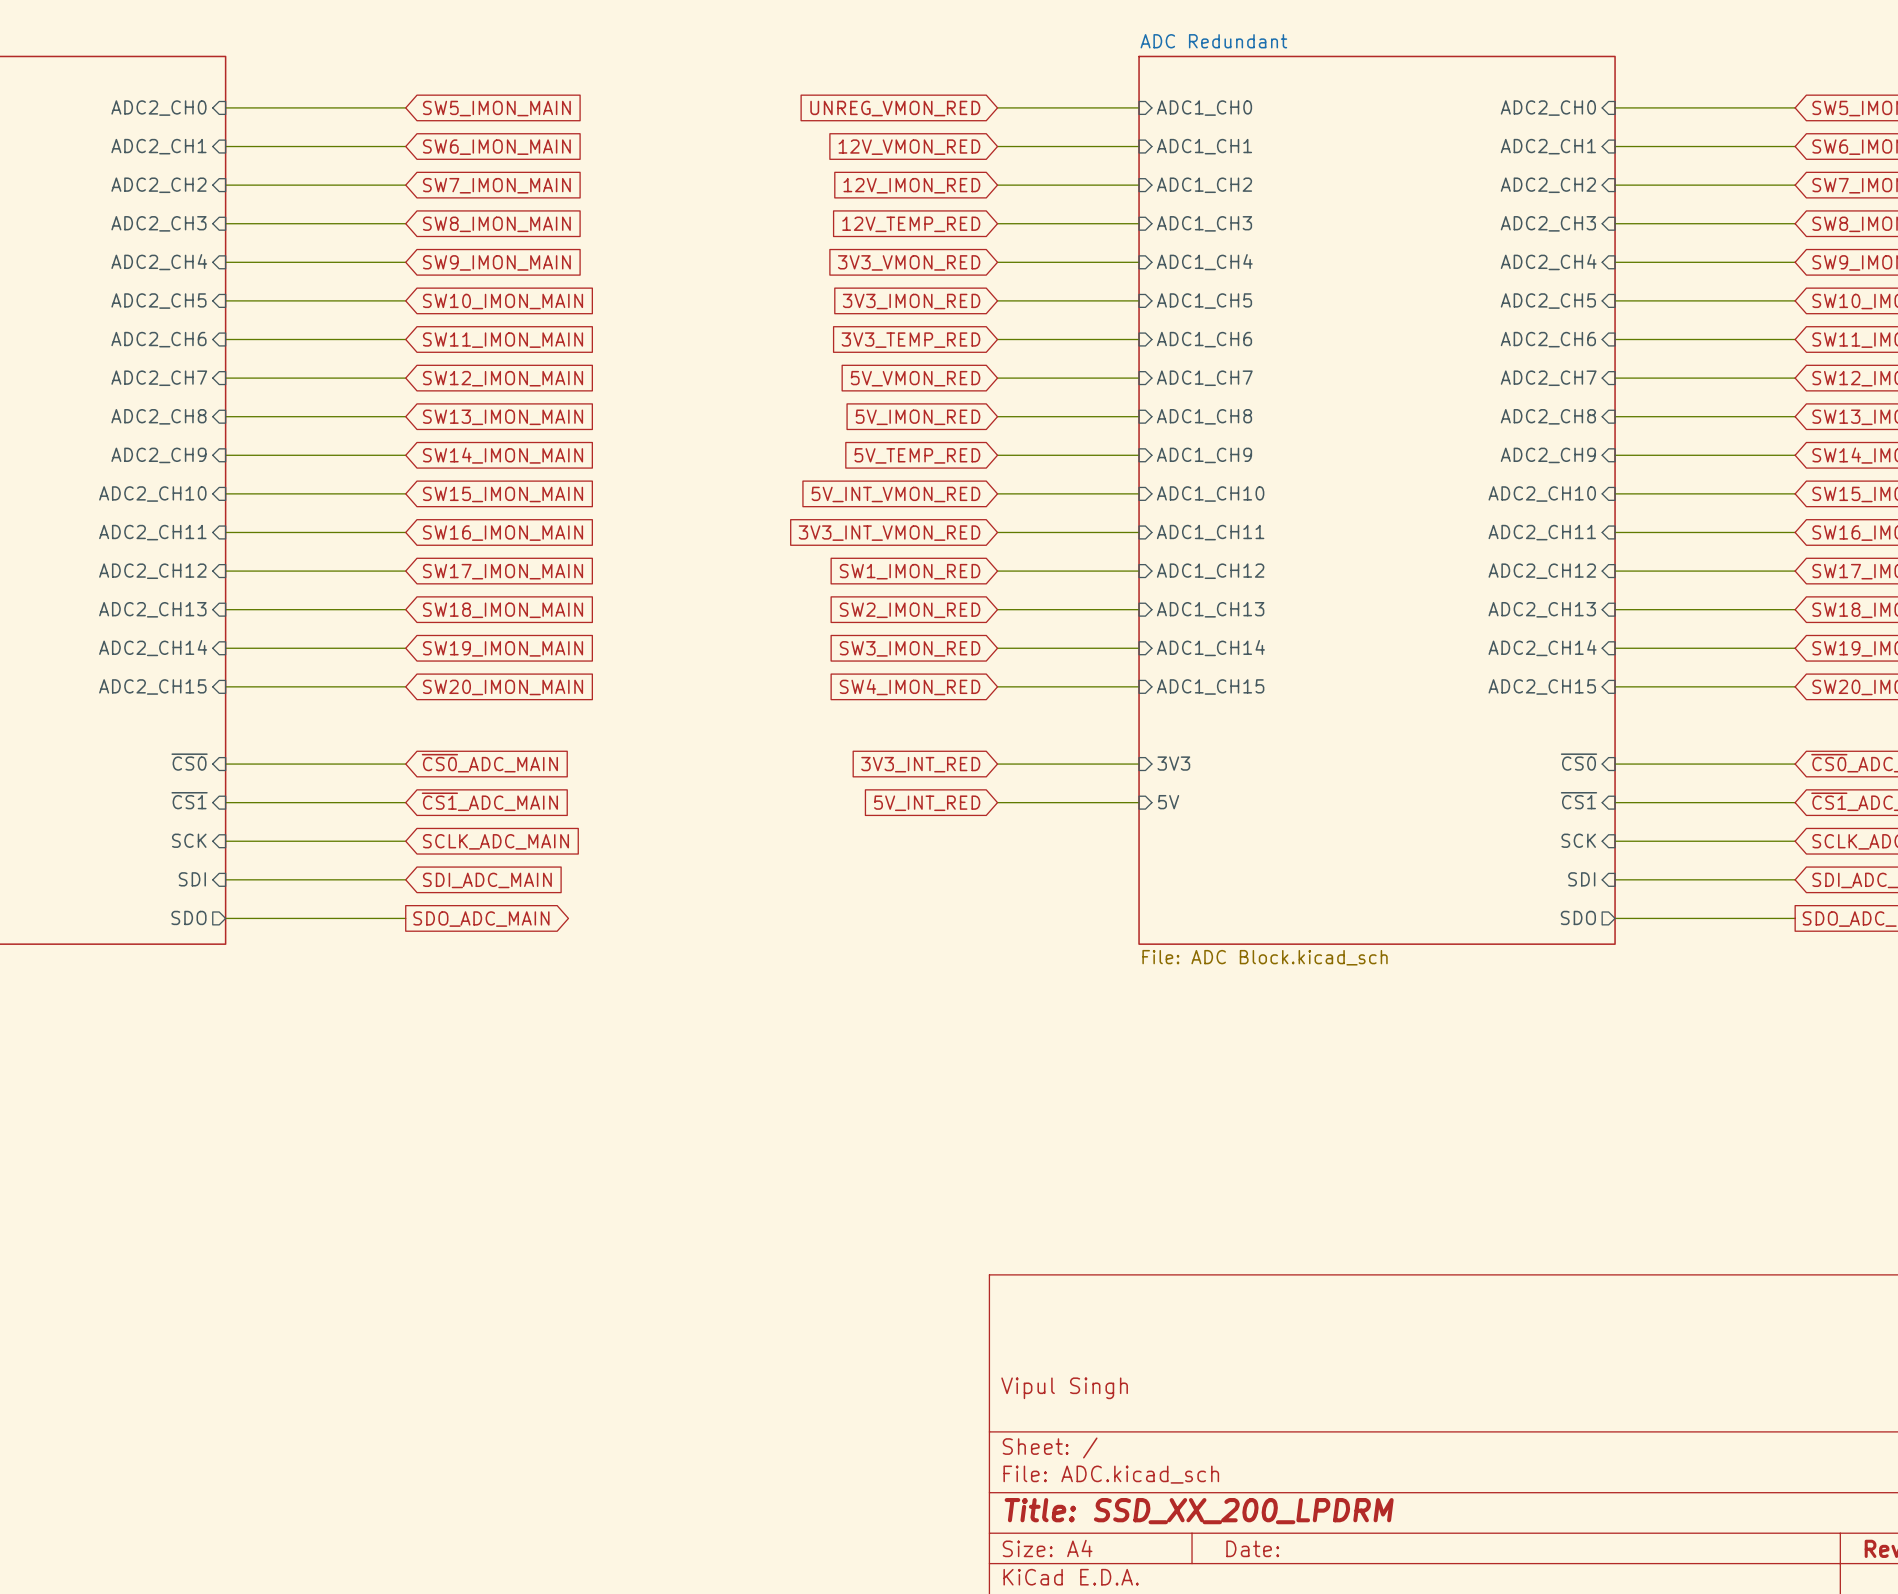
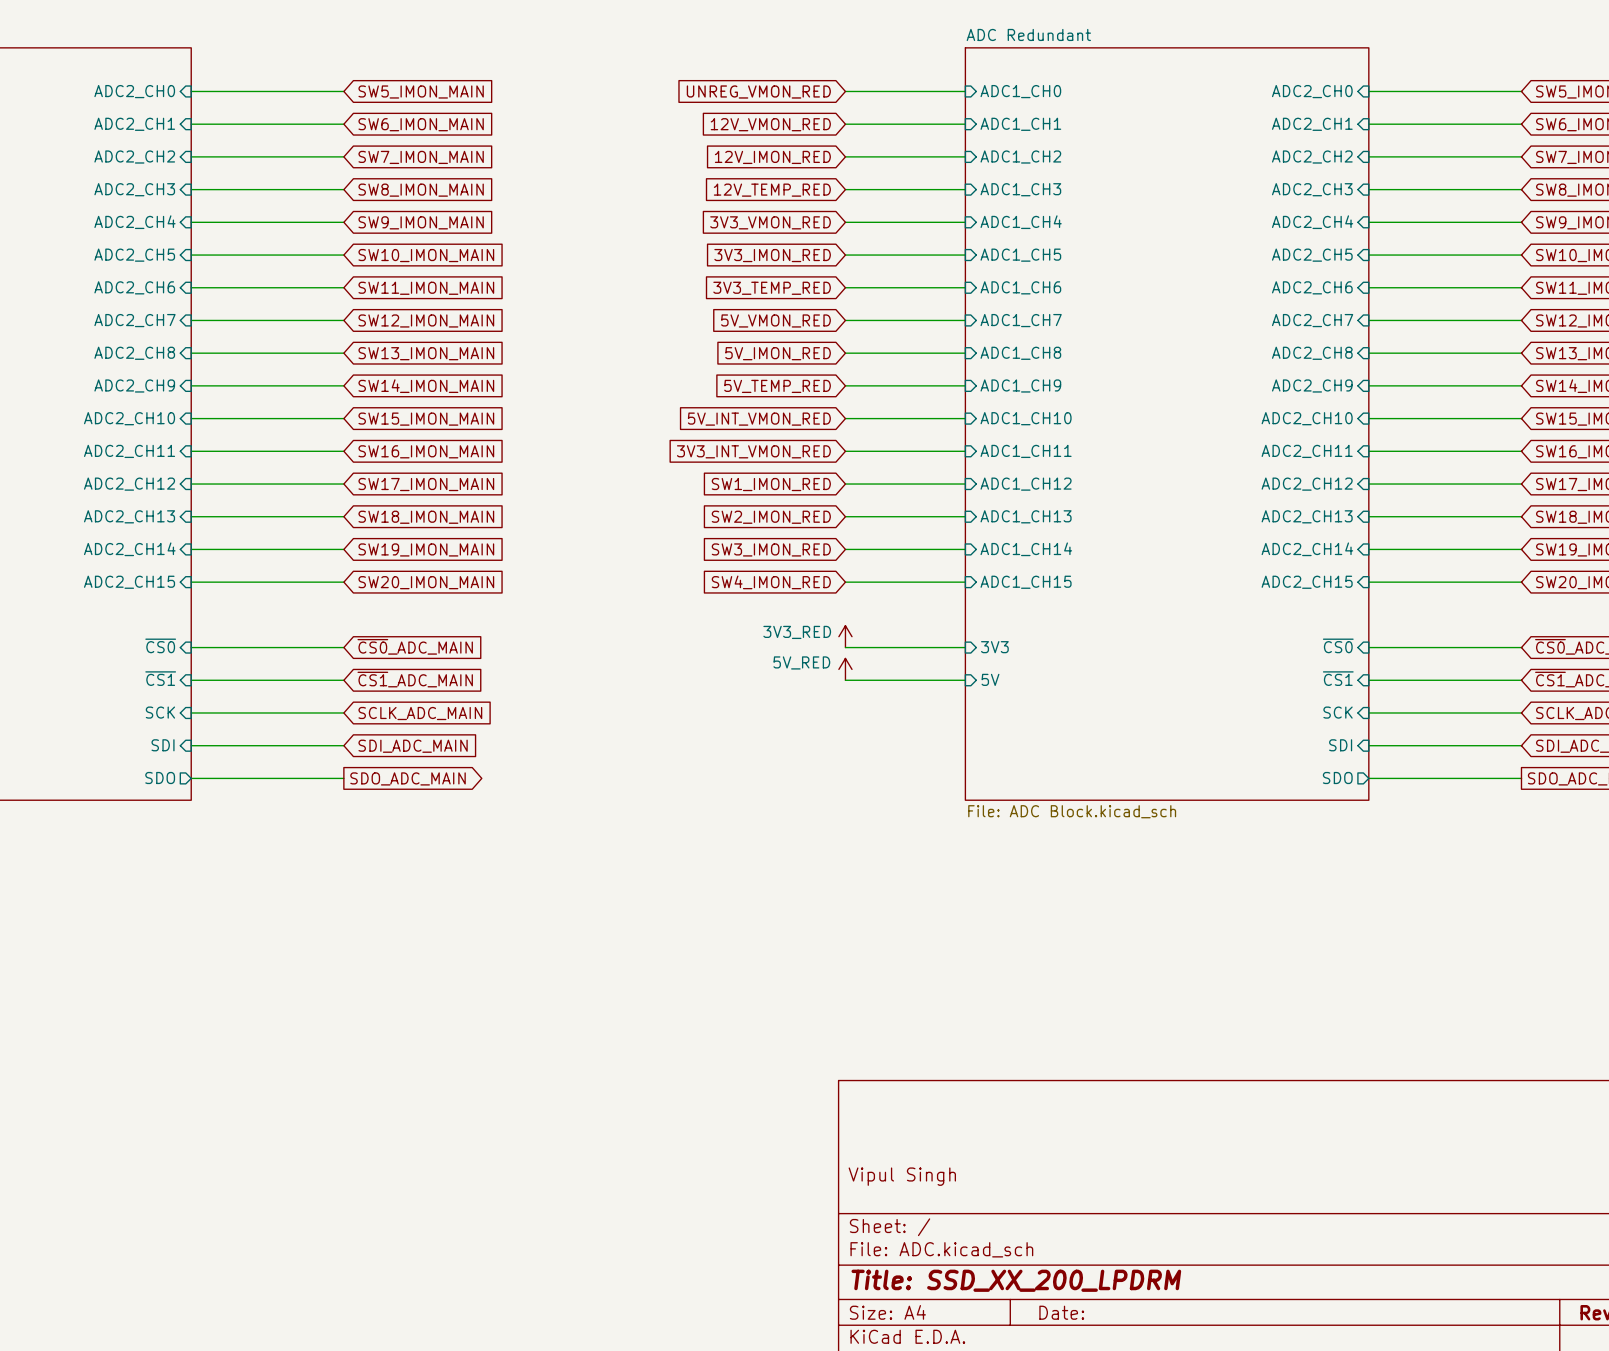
power symbol: none -> 3V3_RED (845, 636)
global label: 3V3_INT_RED (920, 764) -> none
power symbol: none -> 5V_RED (845, 669)
global label: 5V_INT_RED (927, 803) -> none

